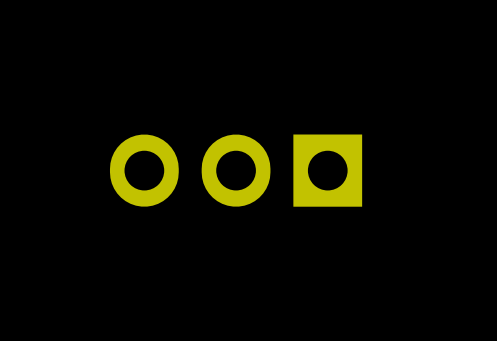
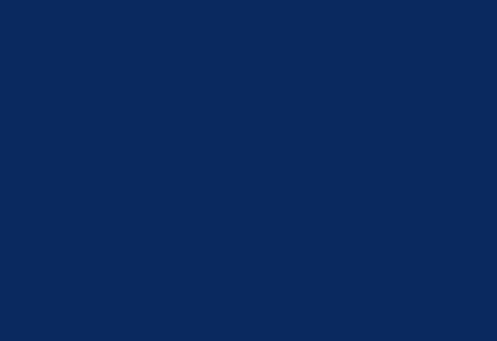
part: (236, 170) -> none

